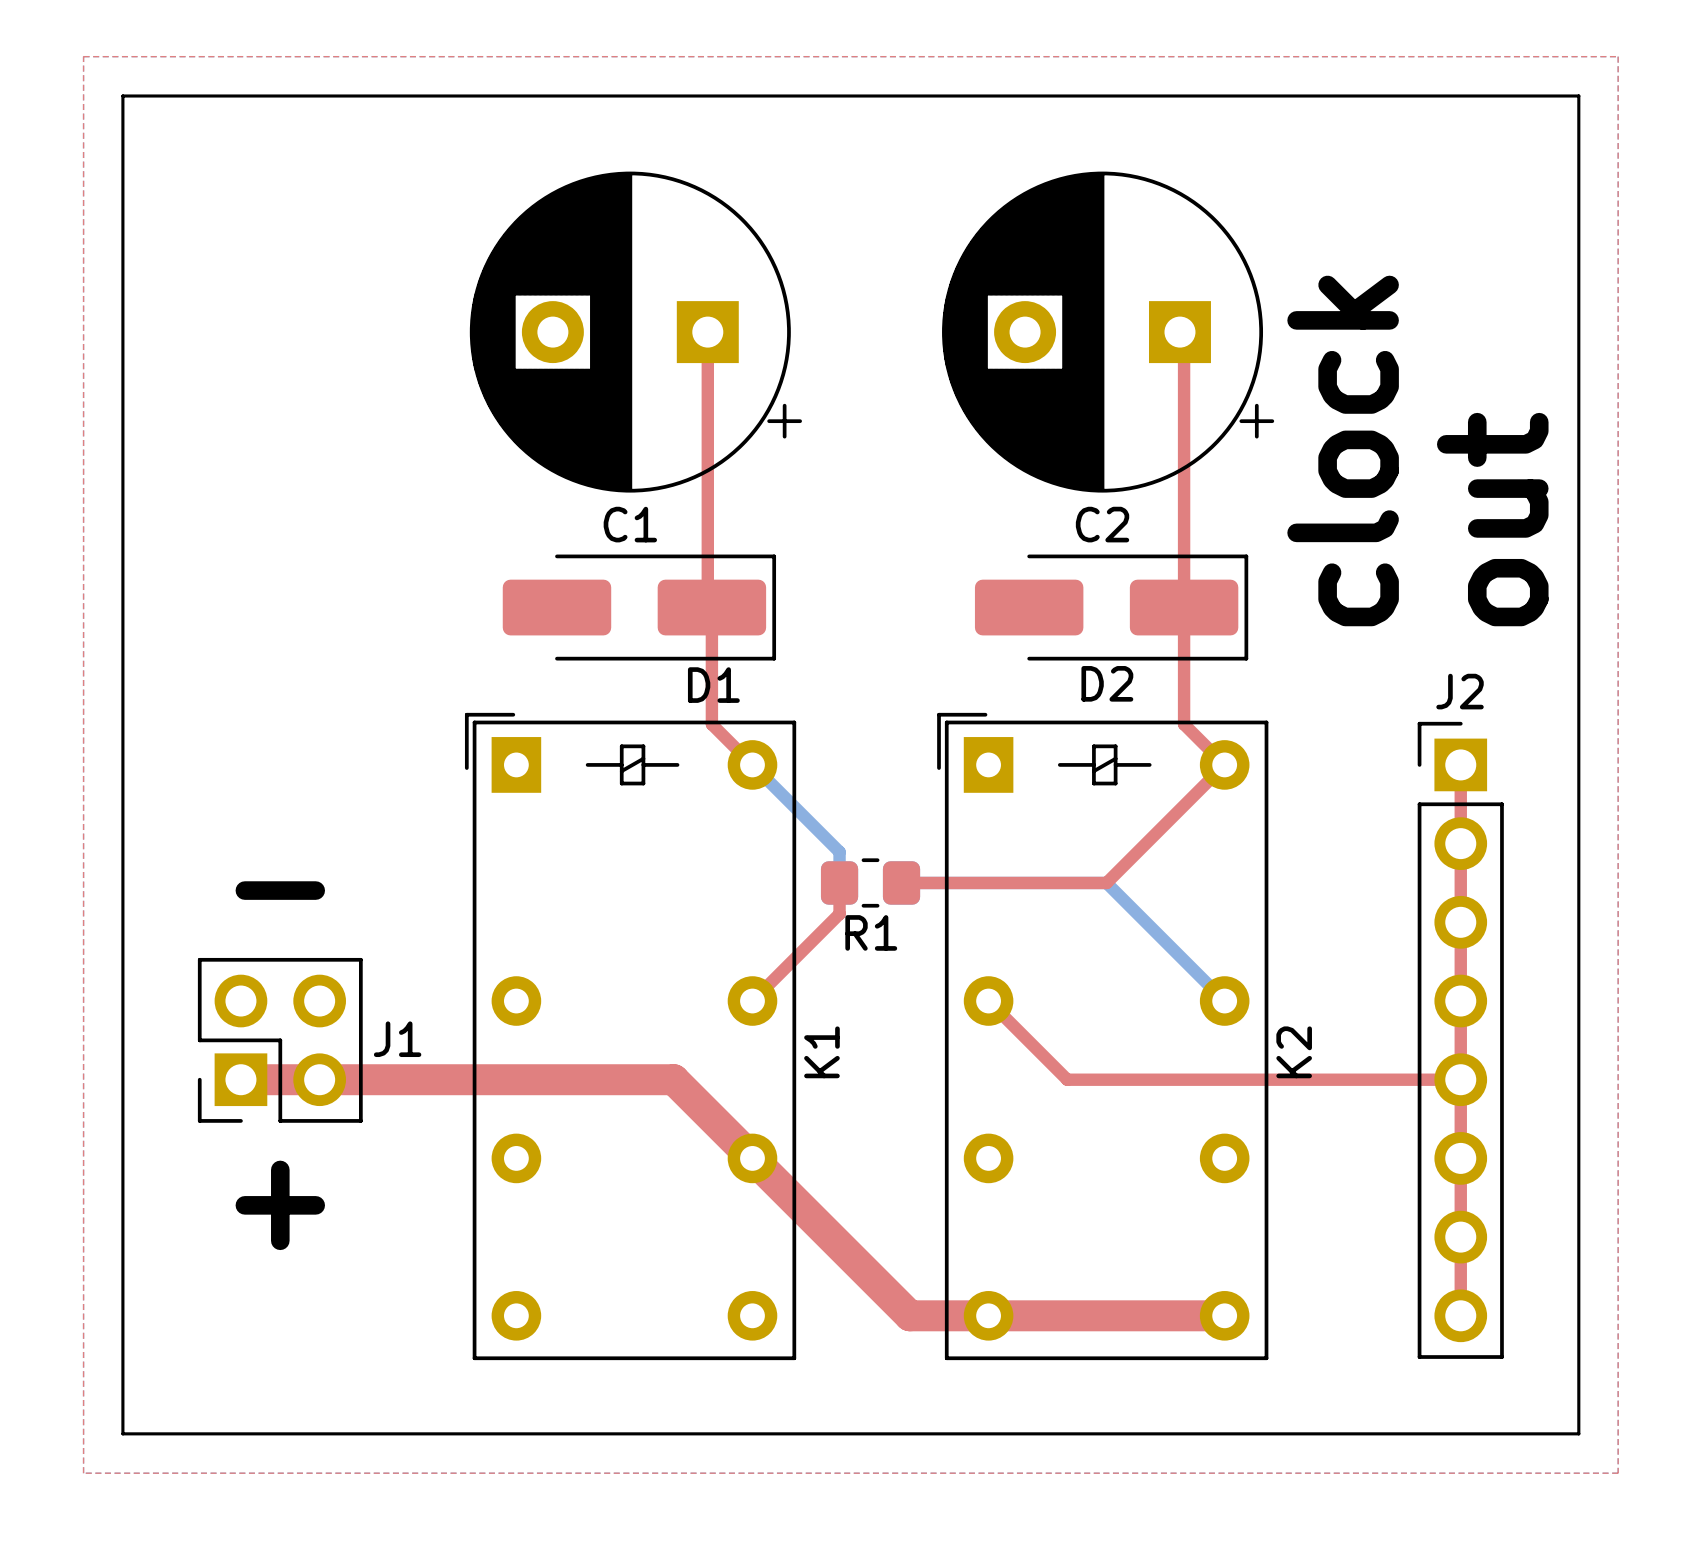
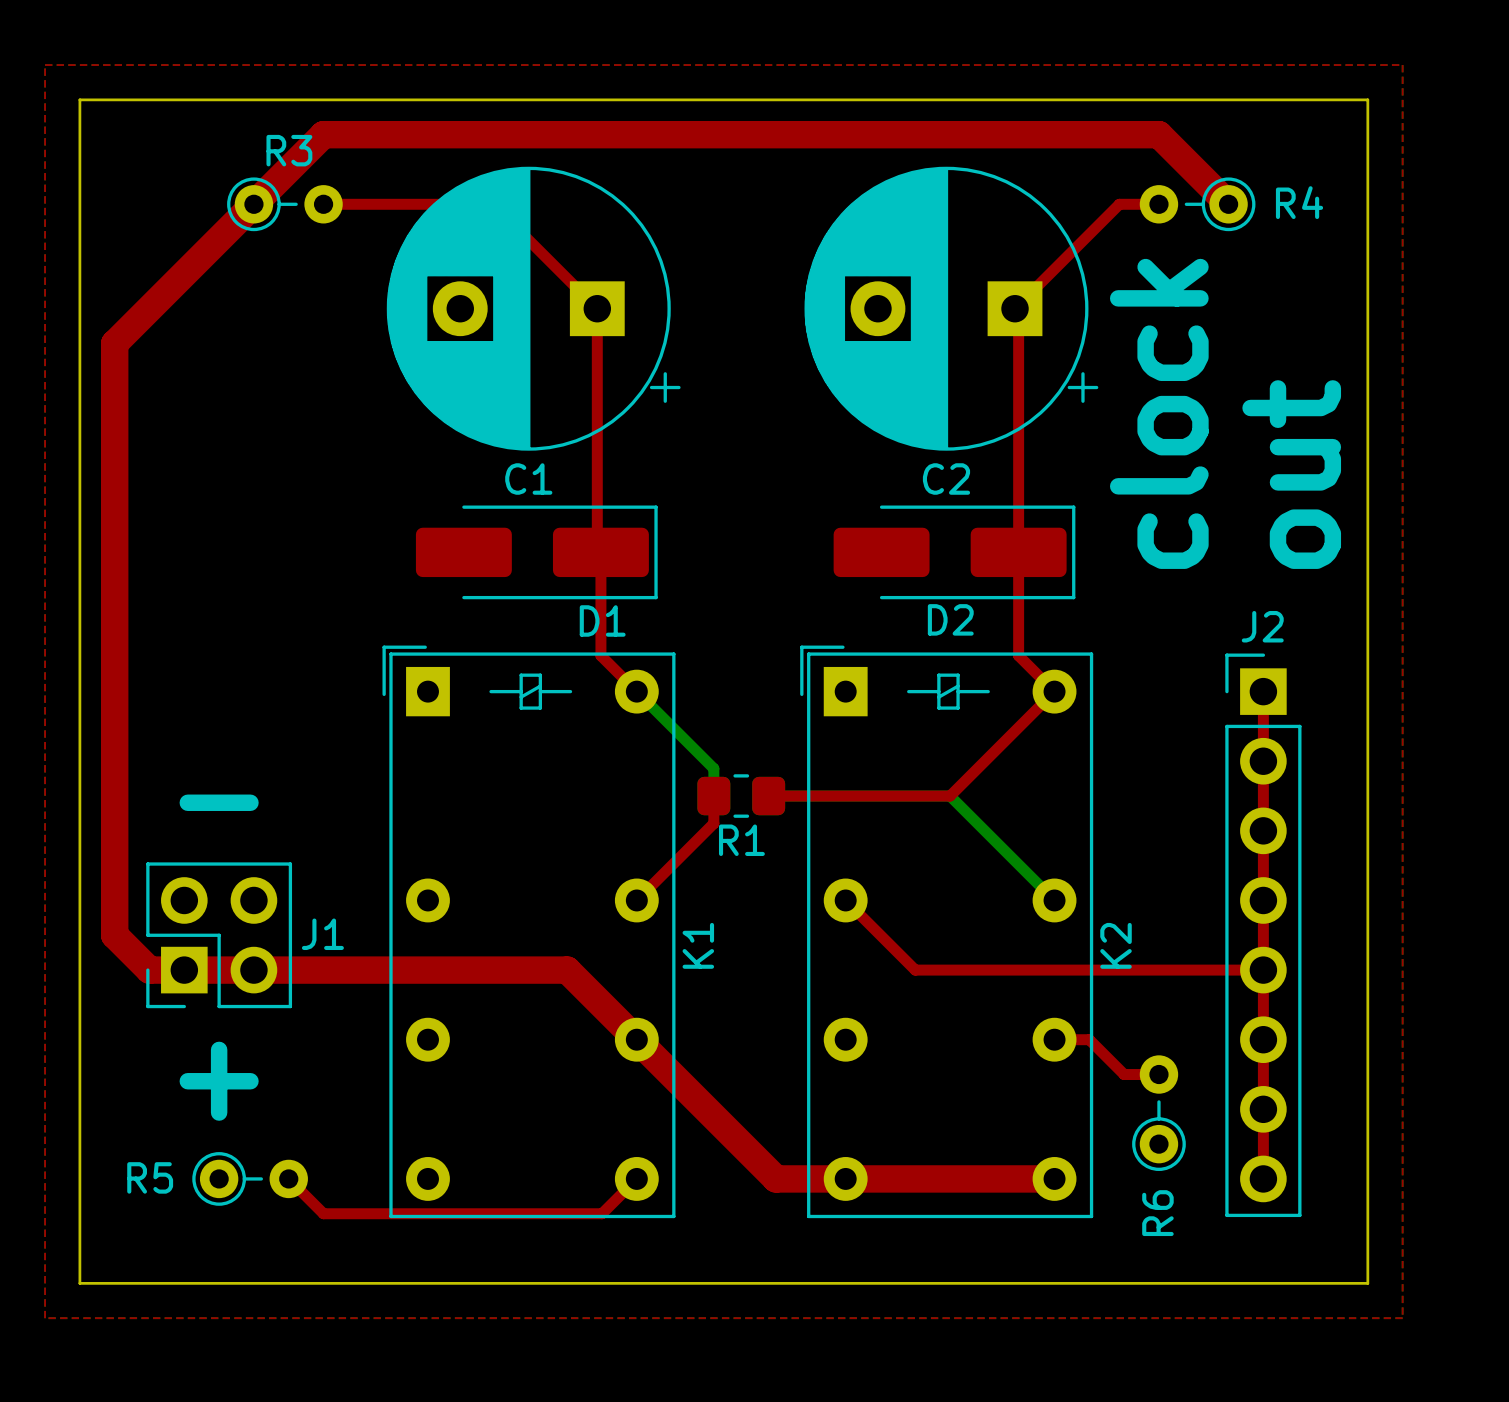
R3: none -> (284, 204)
top track: none -> (323, 204) (492, 204) (597, 308)
top track: none -> (1158, 204) (1119, 204) (1015, 308)
R4: none -> (1197, 204)
top track: none -> (1228, 204) (1158, 134) (323, 134) (114, 343) (114, 935) (149, 970) (184, 970)
top track: none -> (1054, 1039) (1089, 1039) (1124, 1074) (1158, 1074)
R6: none -> (1158, 1113)
R5: none -> (250, 1178)
top track: none -> (288, 1178) (323, 1213) (602, 1213) (636, 1178)

